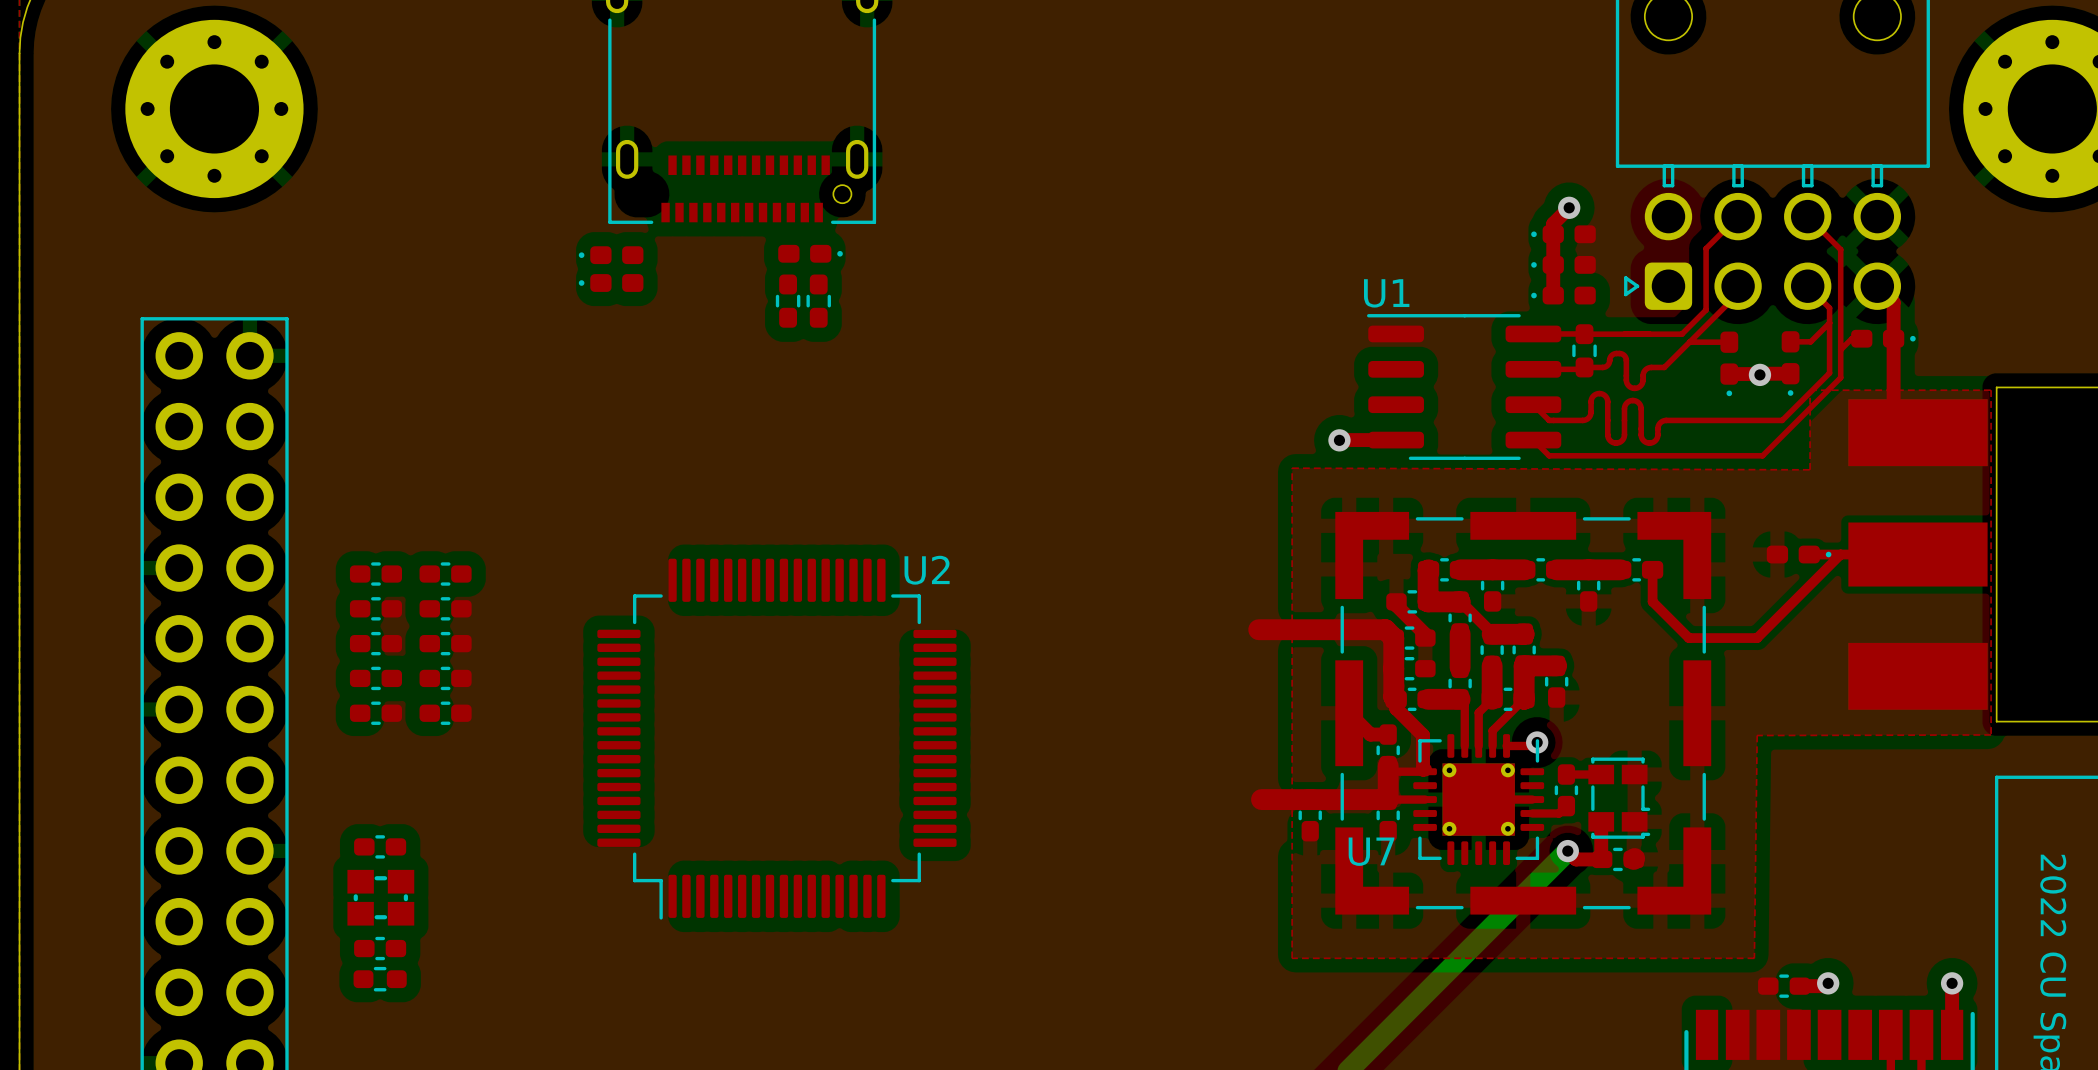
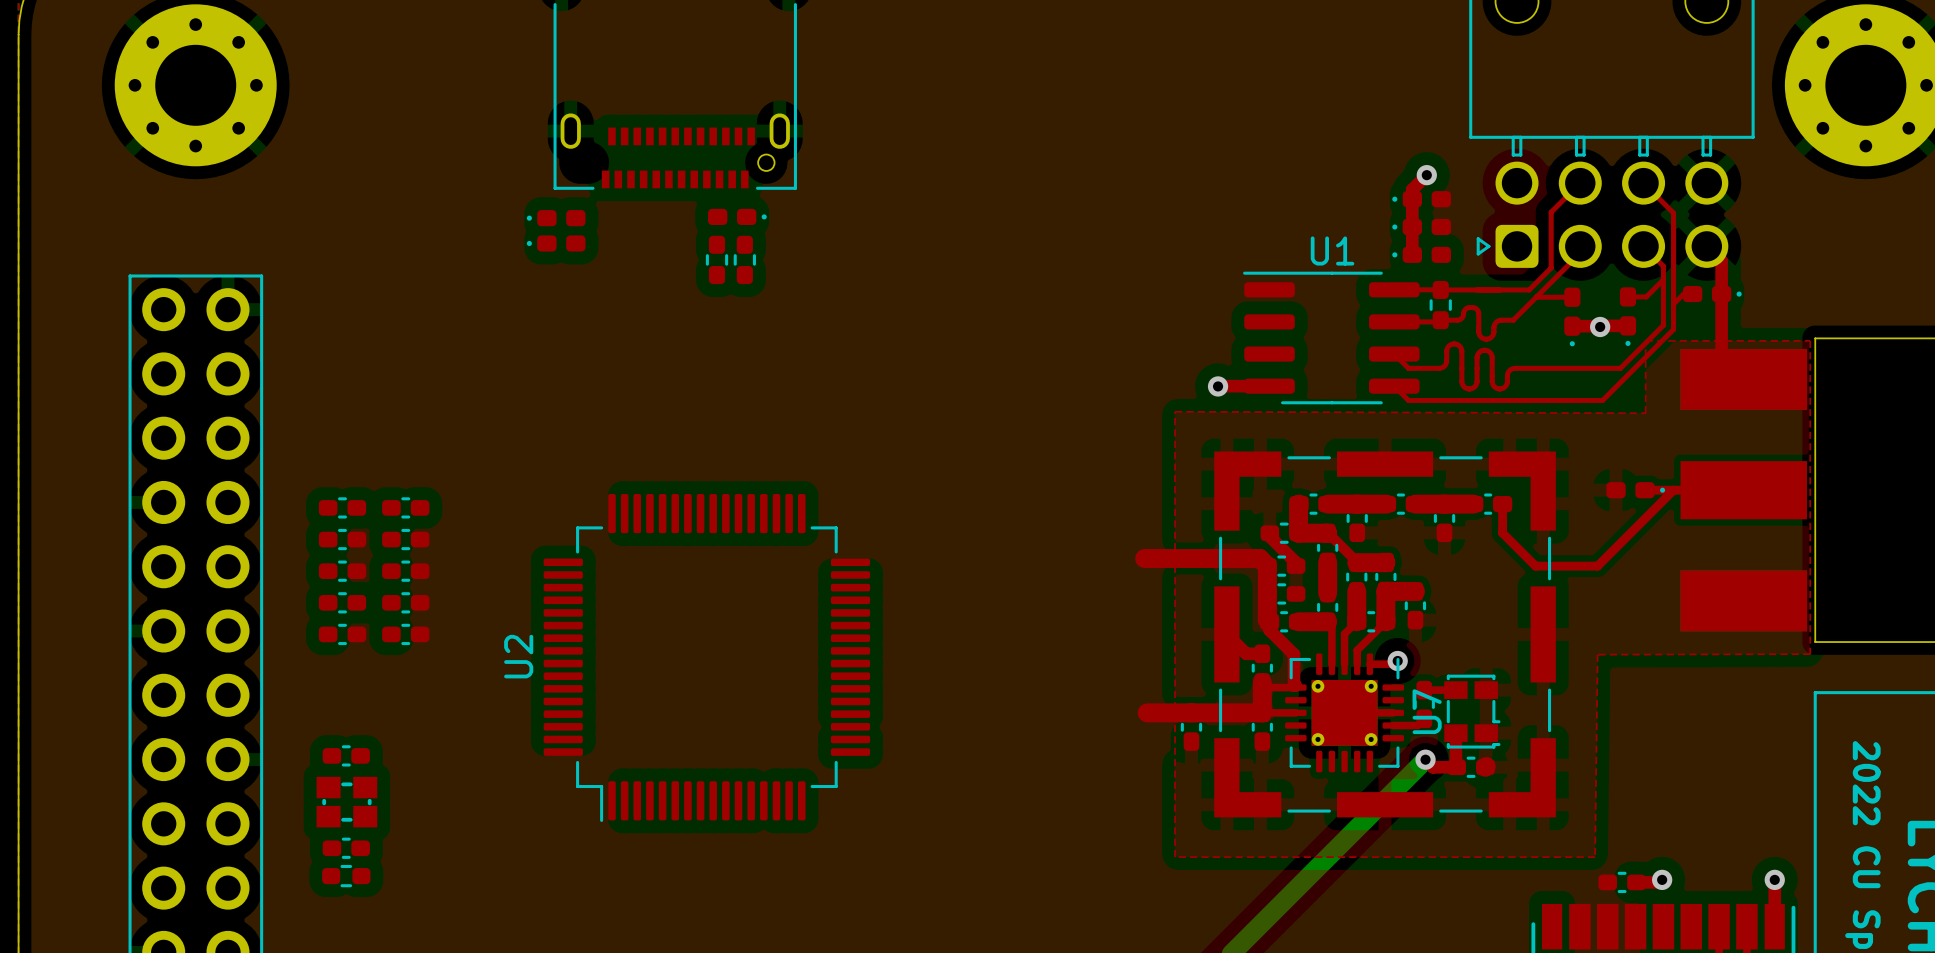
U1 name position: U1 (1386, 293) -> U1 (1332, 251)
U2 name rotation: 0° (927, 570) -> 90° counterclockwise (518, 656)
U2 name position: U2 (927, 570) -> U2 (518, 656)
U7 name rotation: 0° (1371, 851) -> 90° counterclockwise (1427, 711)
U7 name position: U7 (1371, 851) -> U7 (1427, 711)

